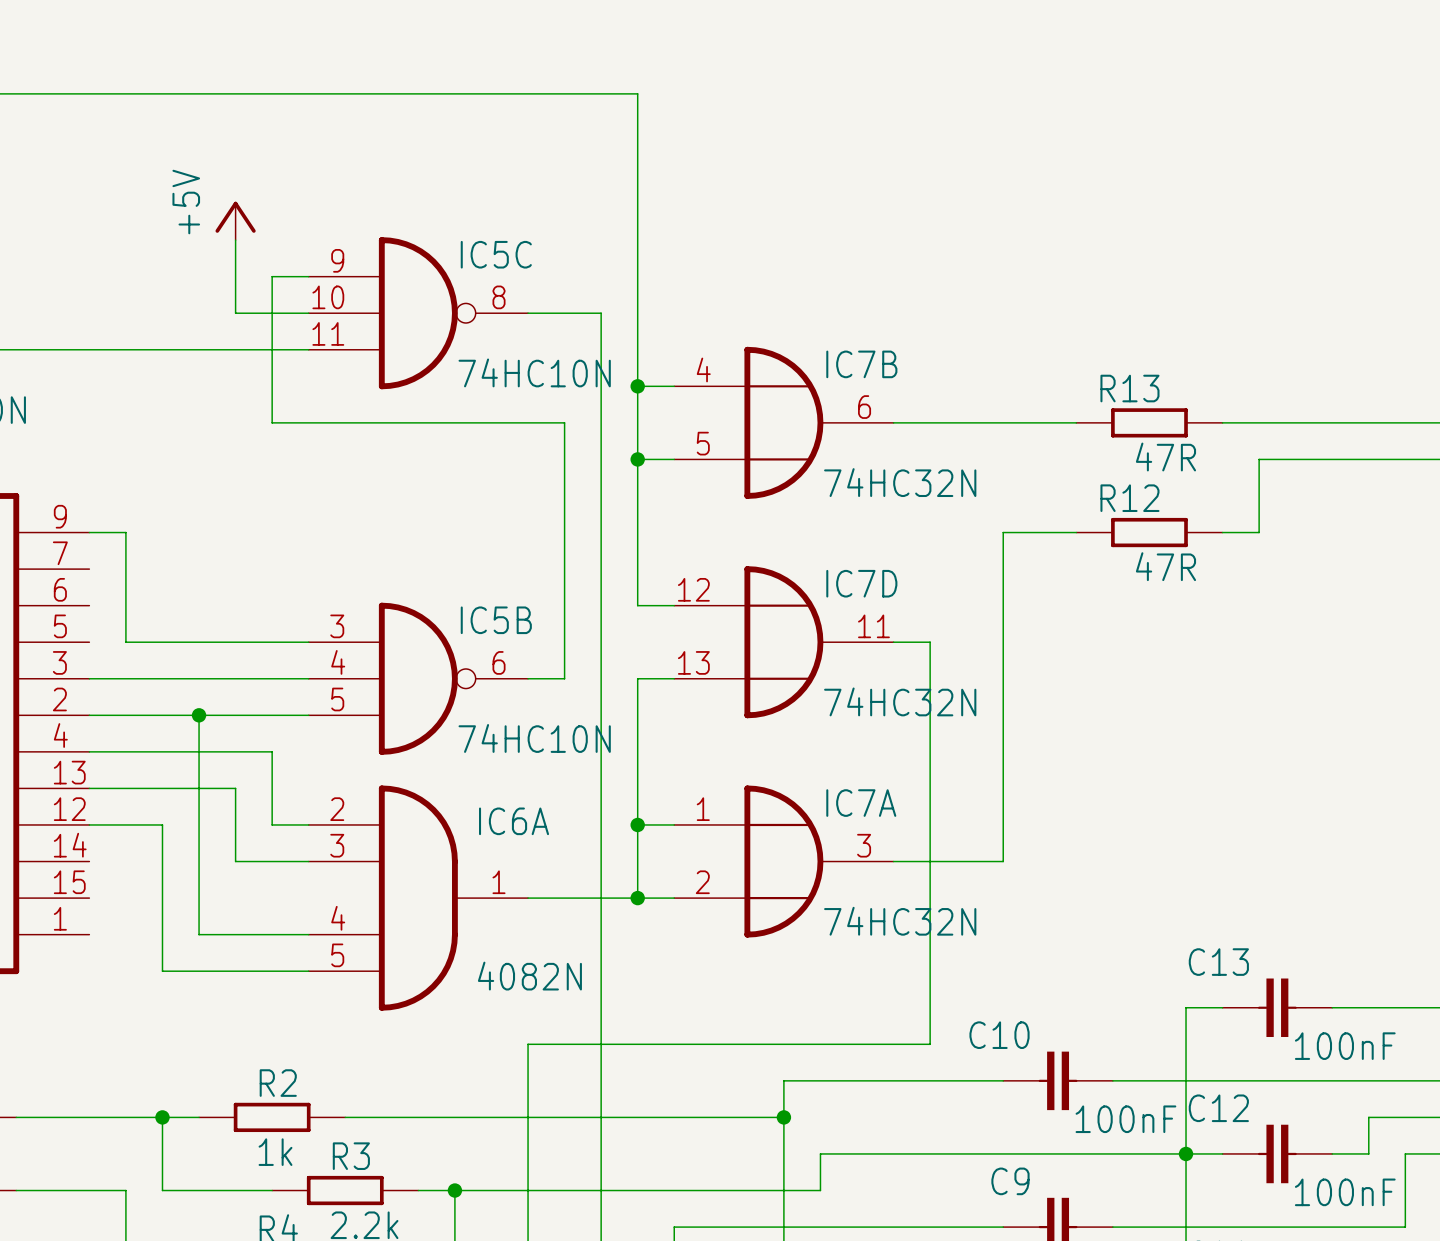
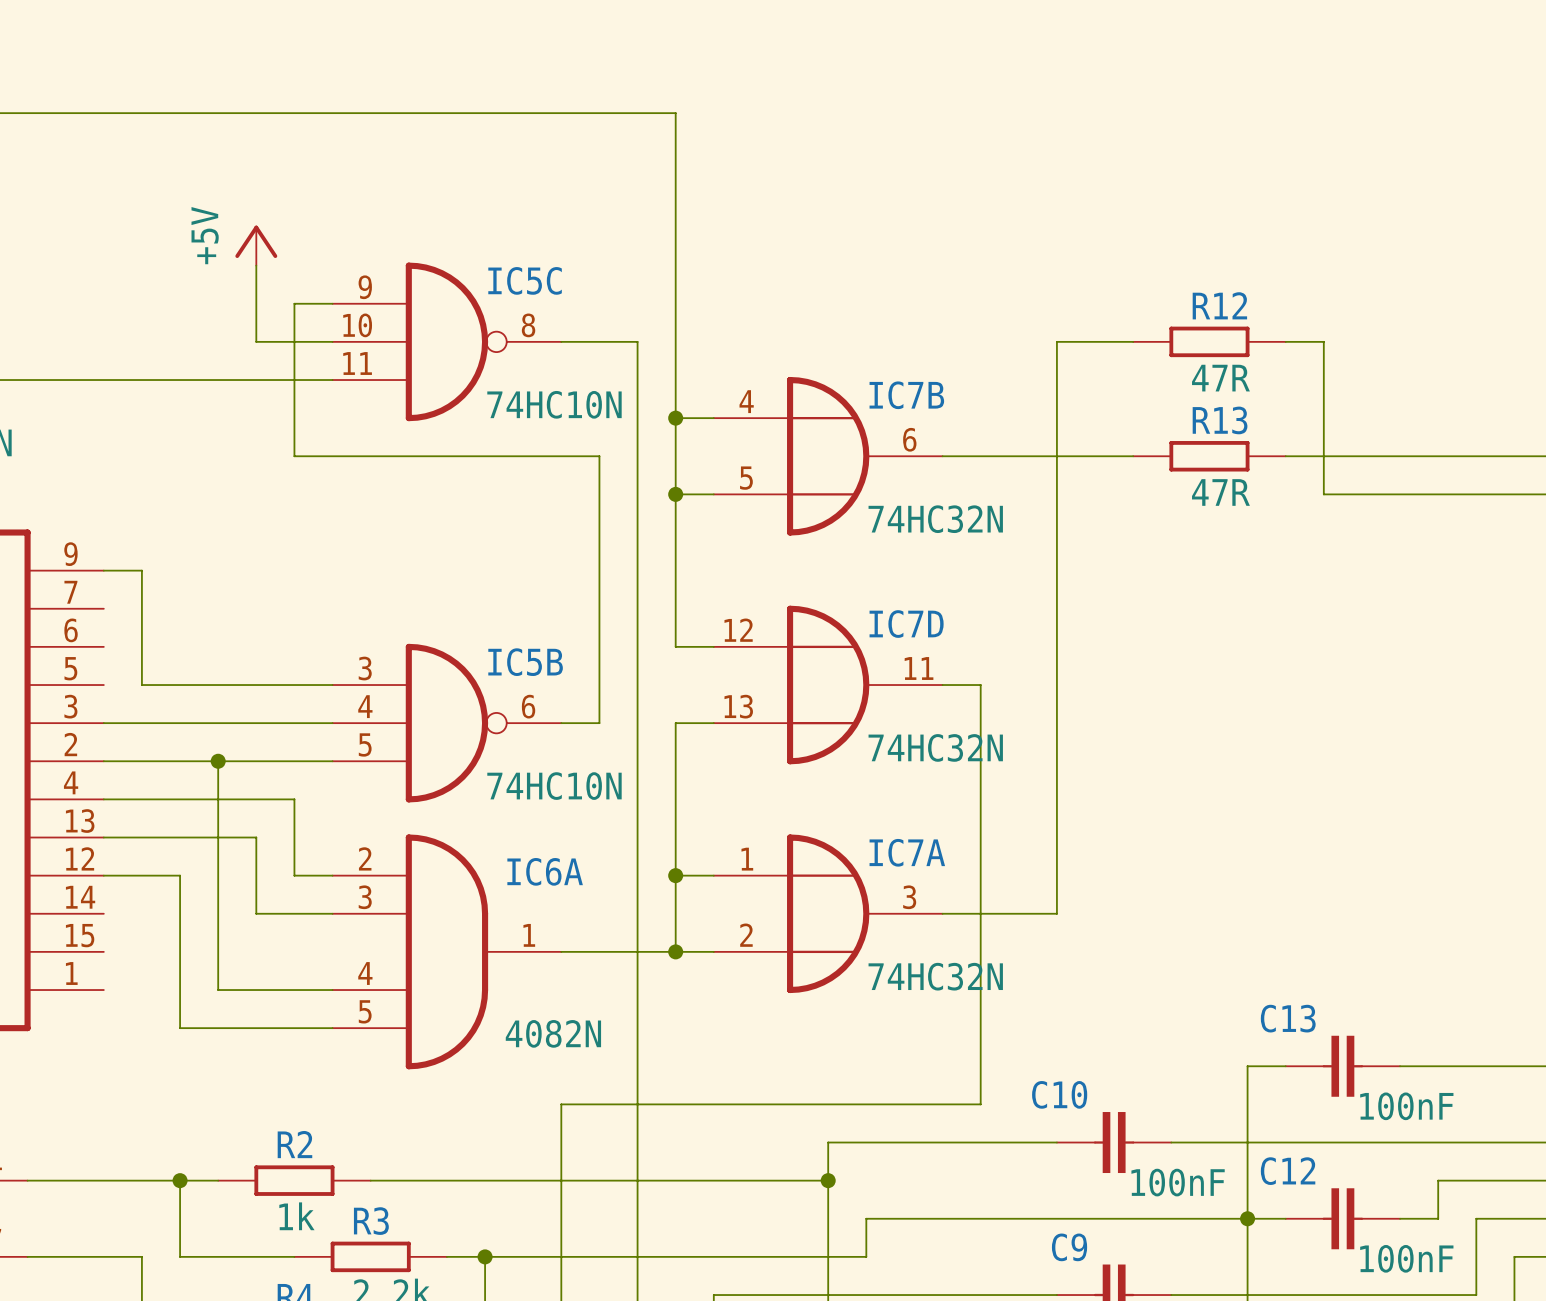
R13 name position: R13 (1129, 388) -> R13 (1220, 420)
wire: (1259, 459) (1259, 532) (1222, 532) -> (1323, 494) (1323, 341) (1285, 341)
R12 name position: R12 (1129, 498) -> R12 (1219, 305)
wire: (1003, 532) (1076, 532) -> (1056, 570) (1056, 341) (1133, 341)
R12 position: (1149, 532) -> (1209, 341)

